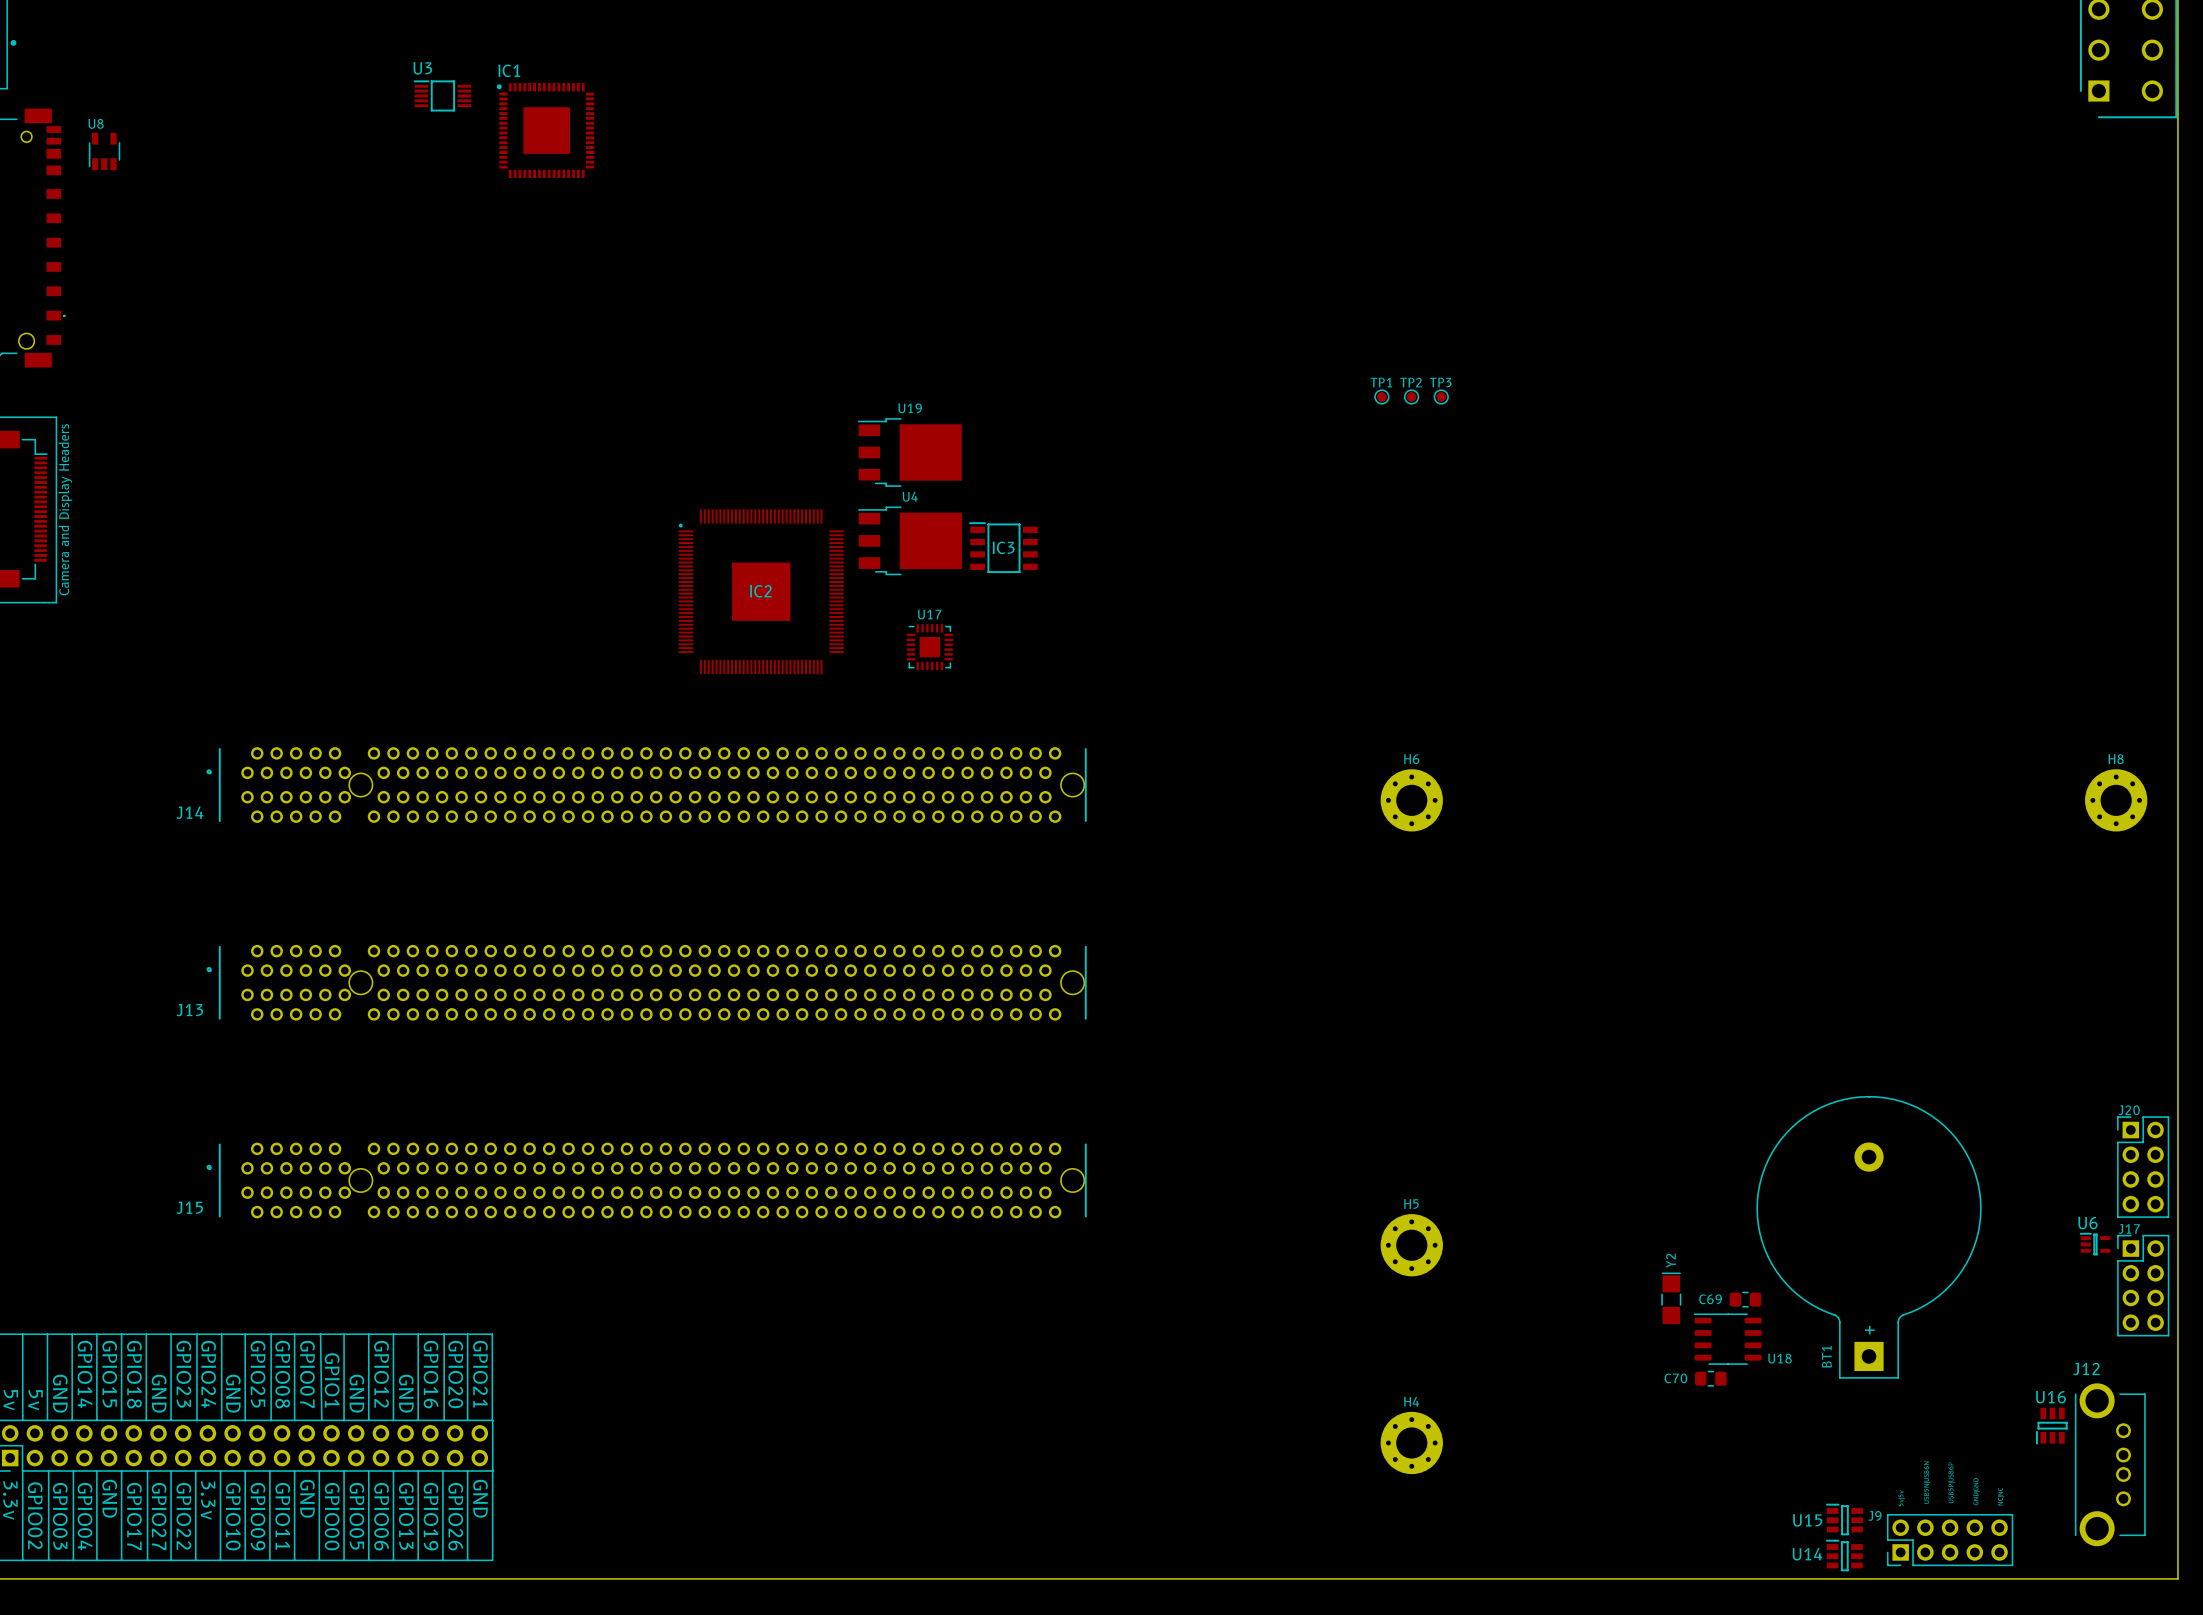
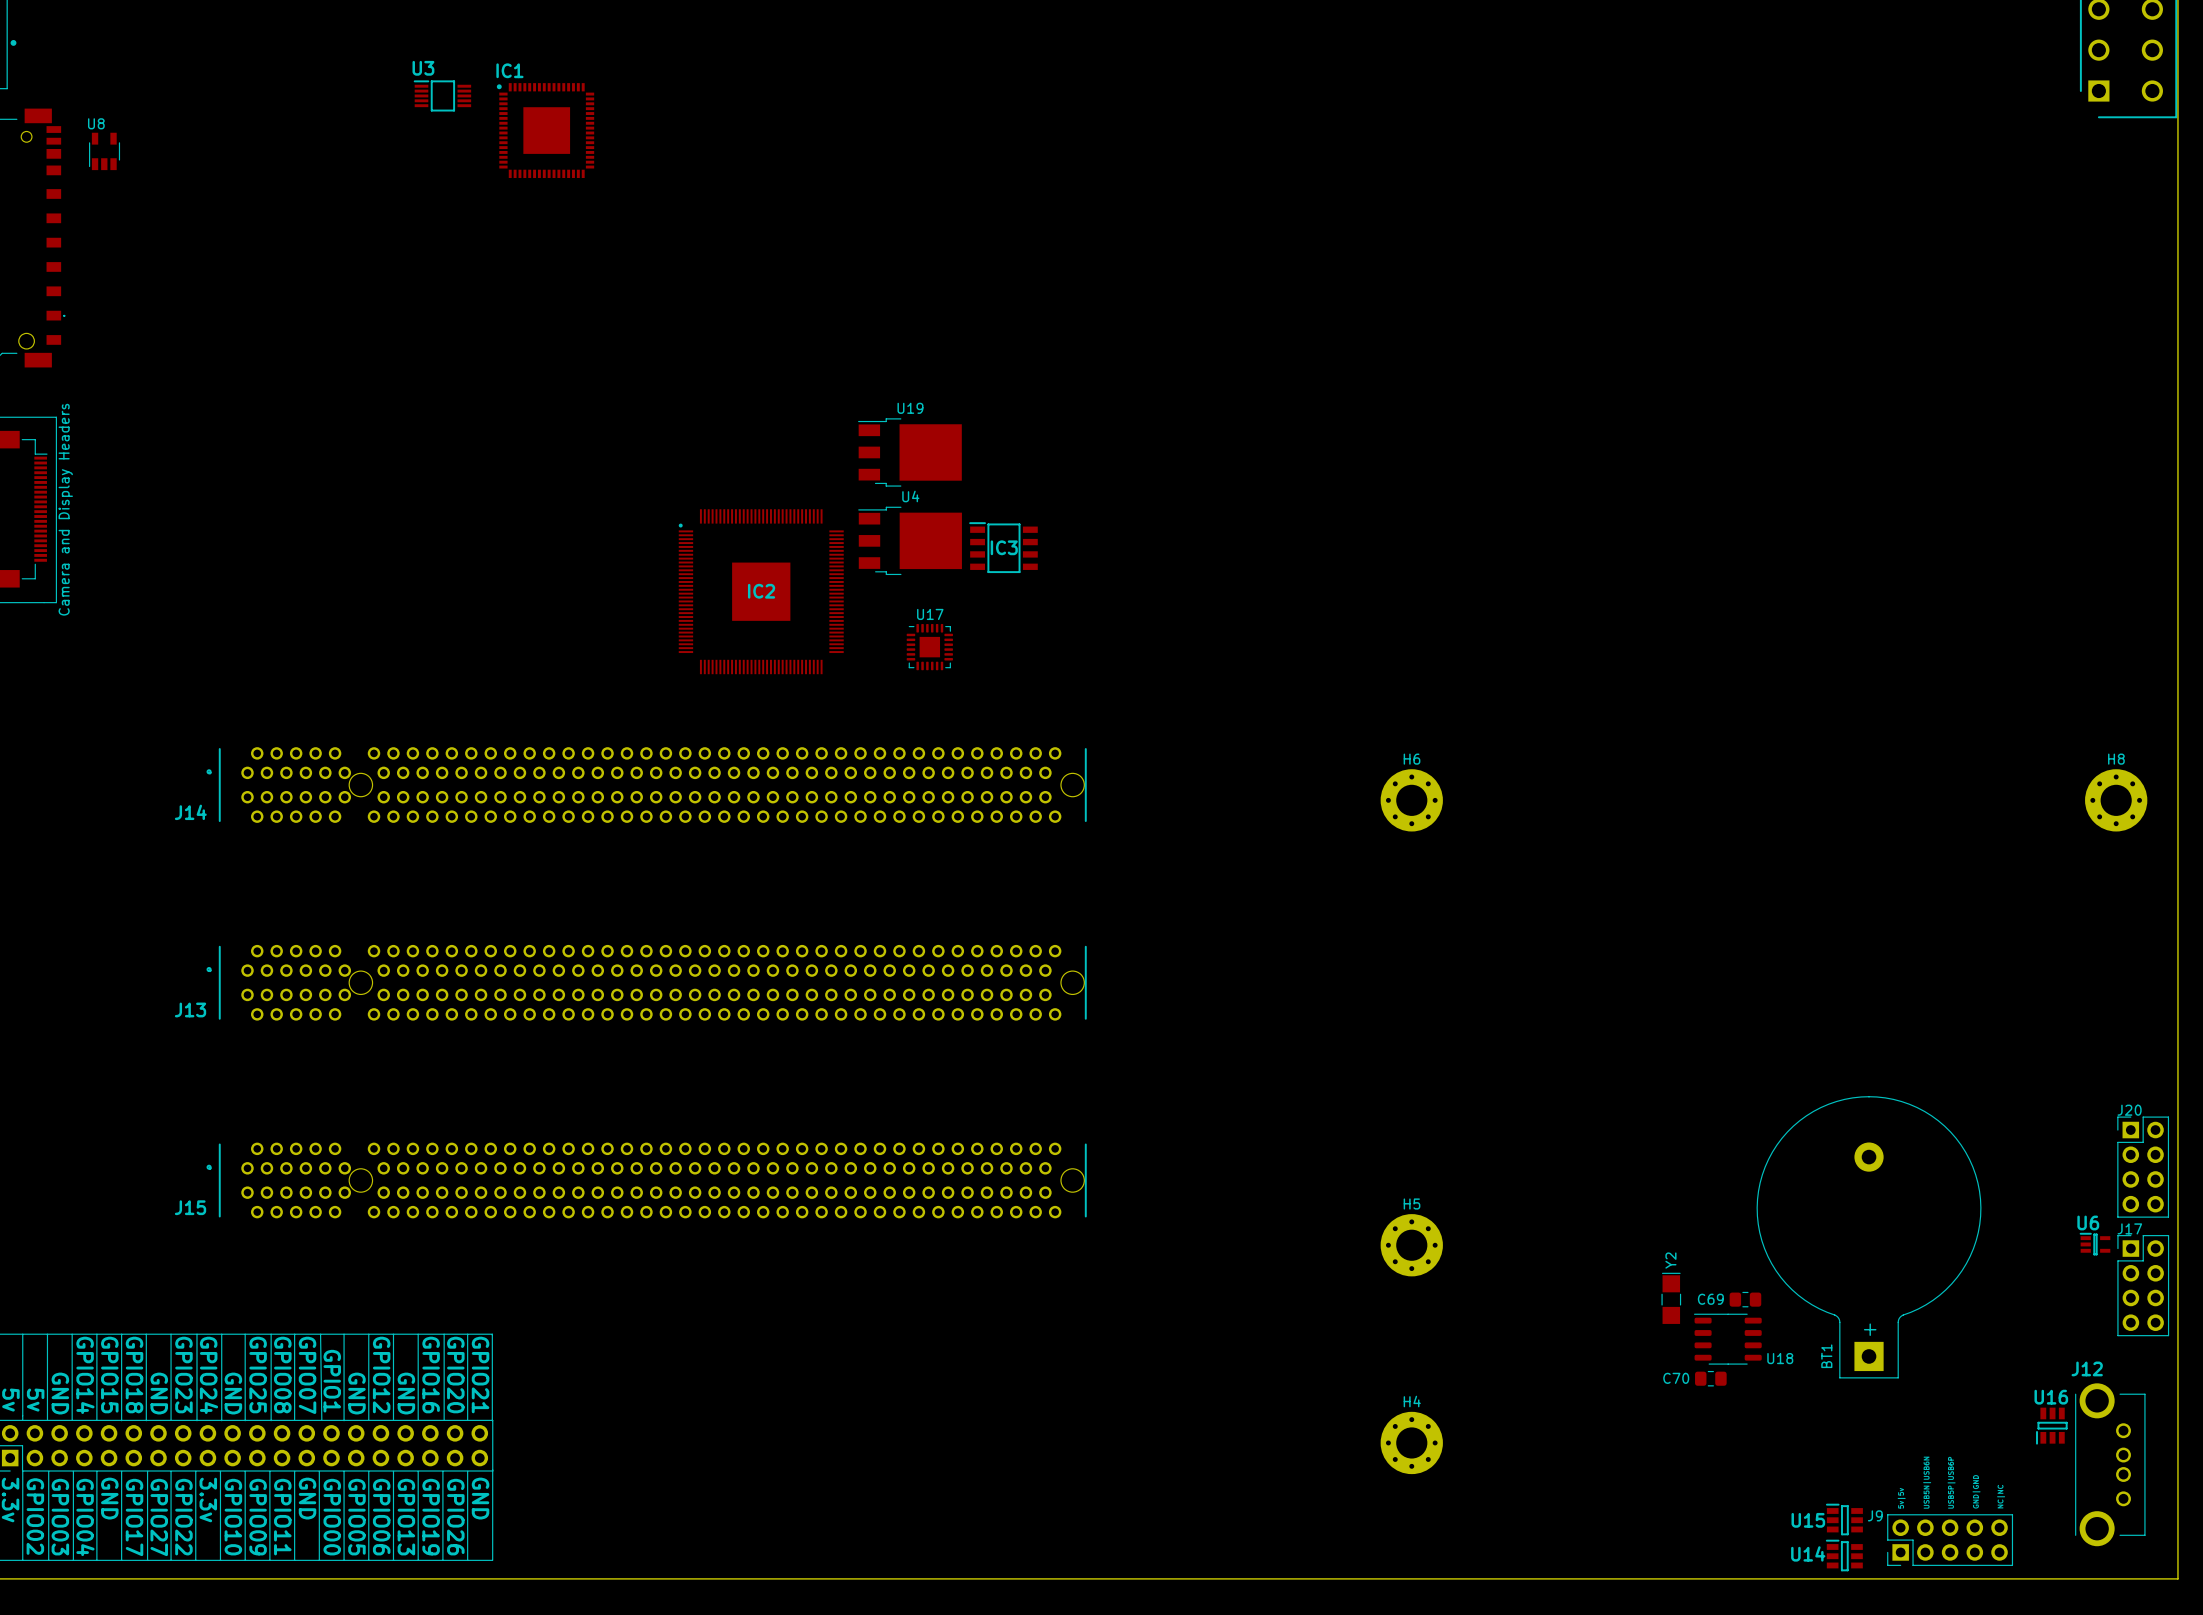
TP1: (1381, 396) -> none
TP2: (1411, 396) -> none
TP3: (1441, 396) -> none

